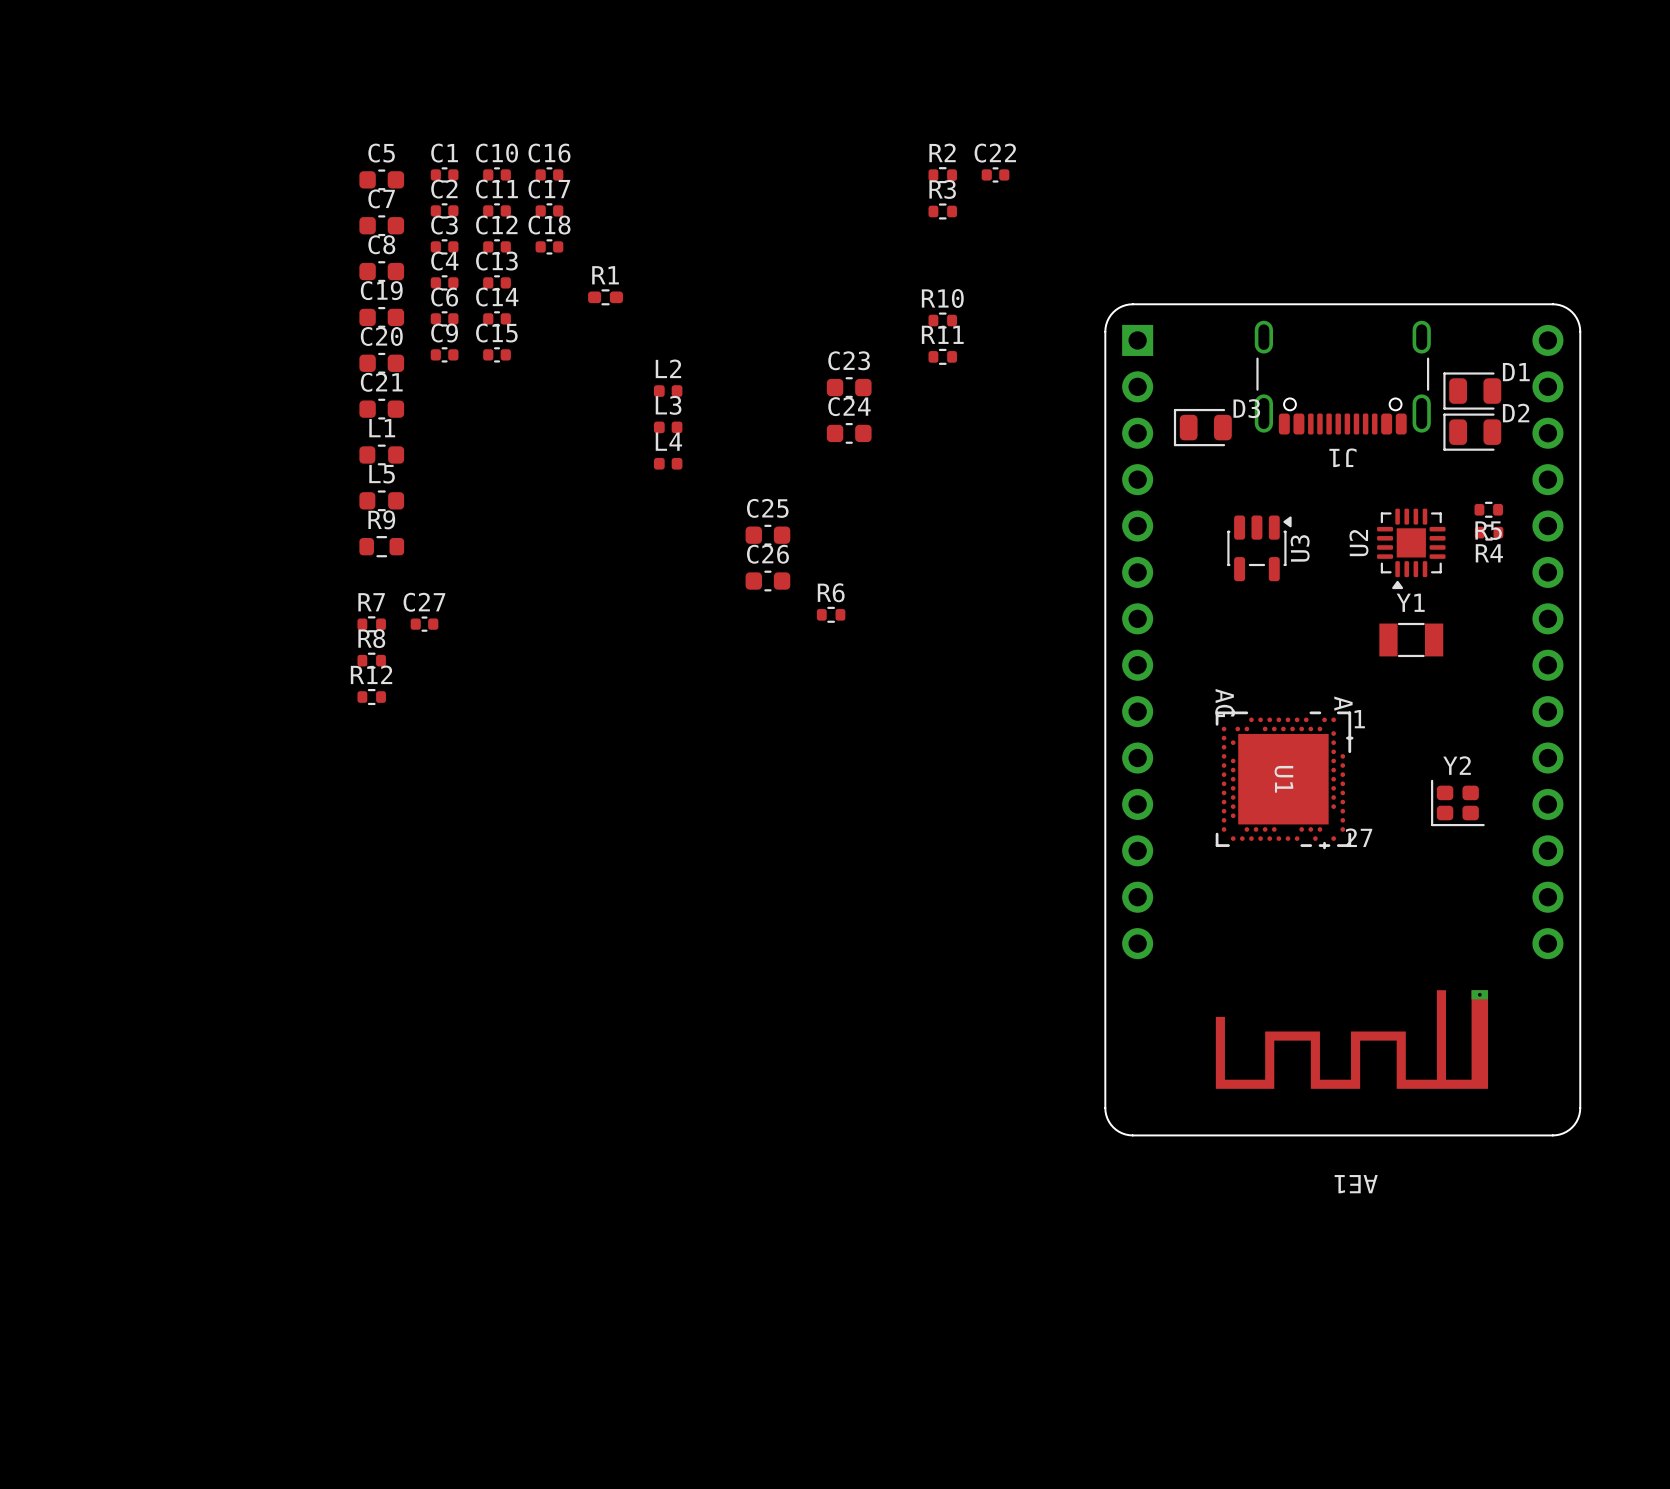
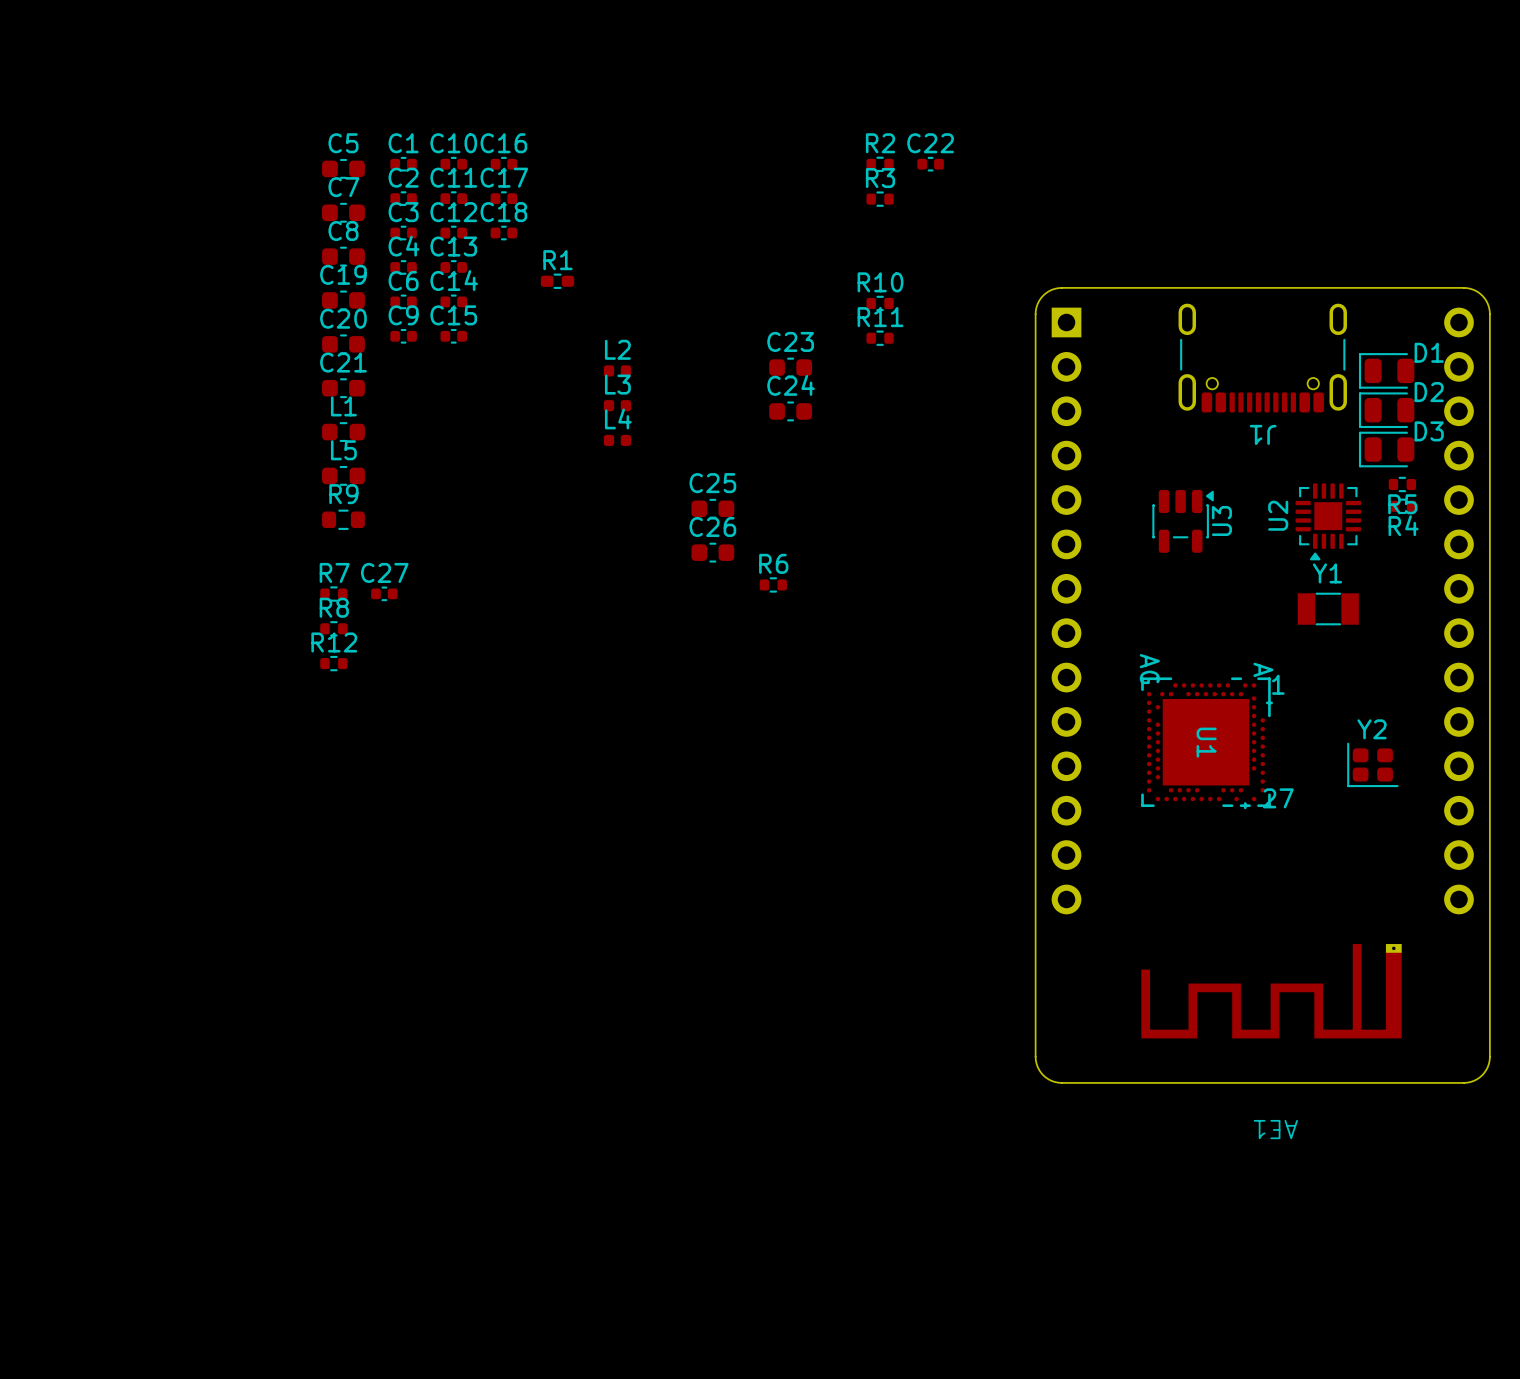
D3 position: (1202, 427) -> (1386, 449)

